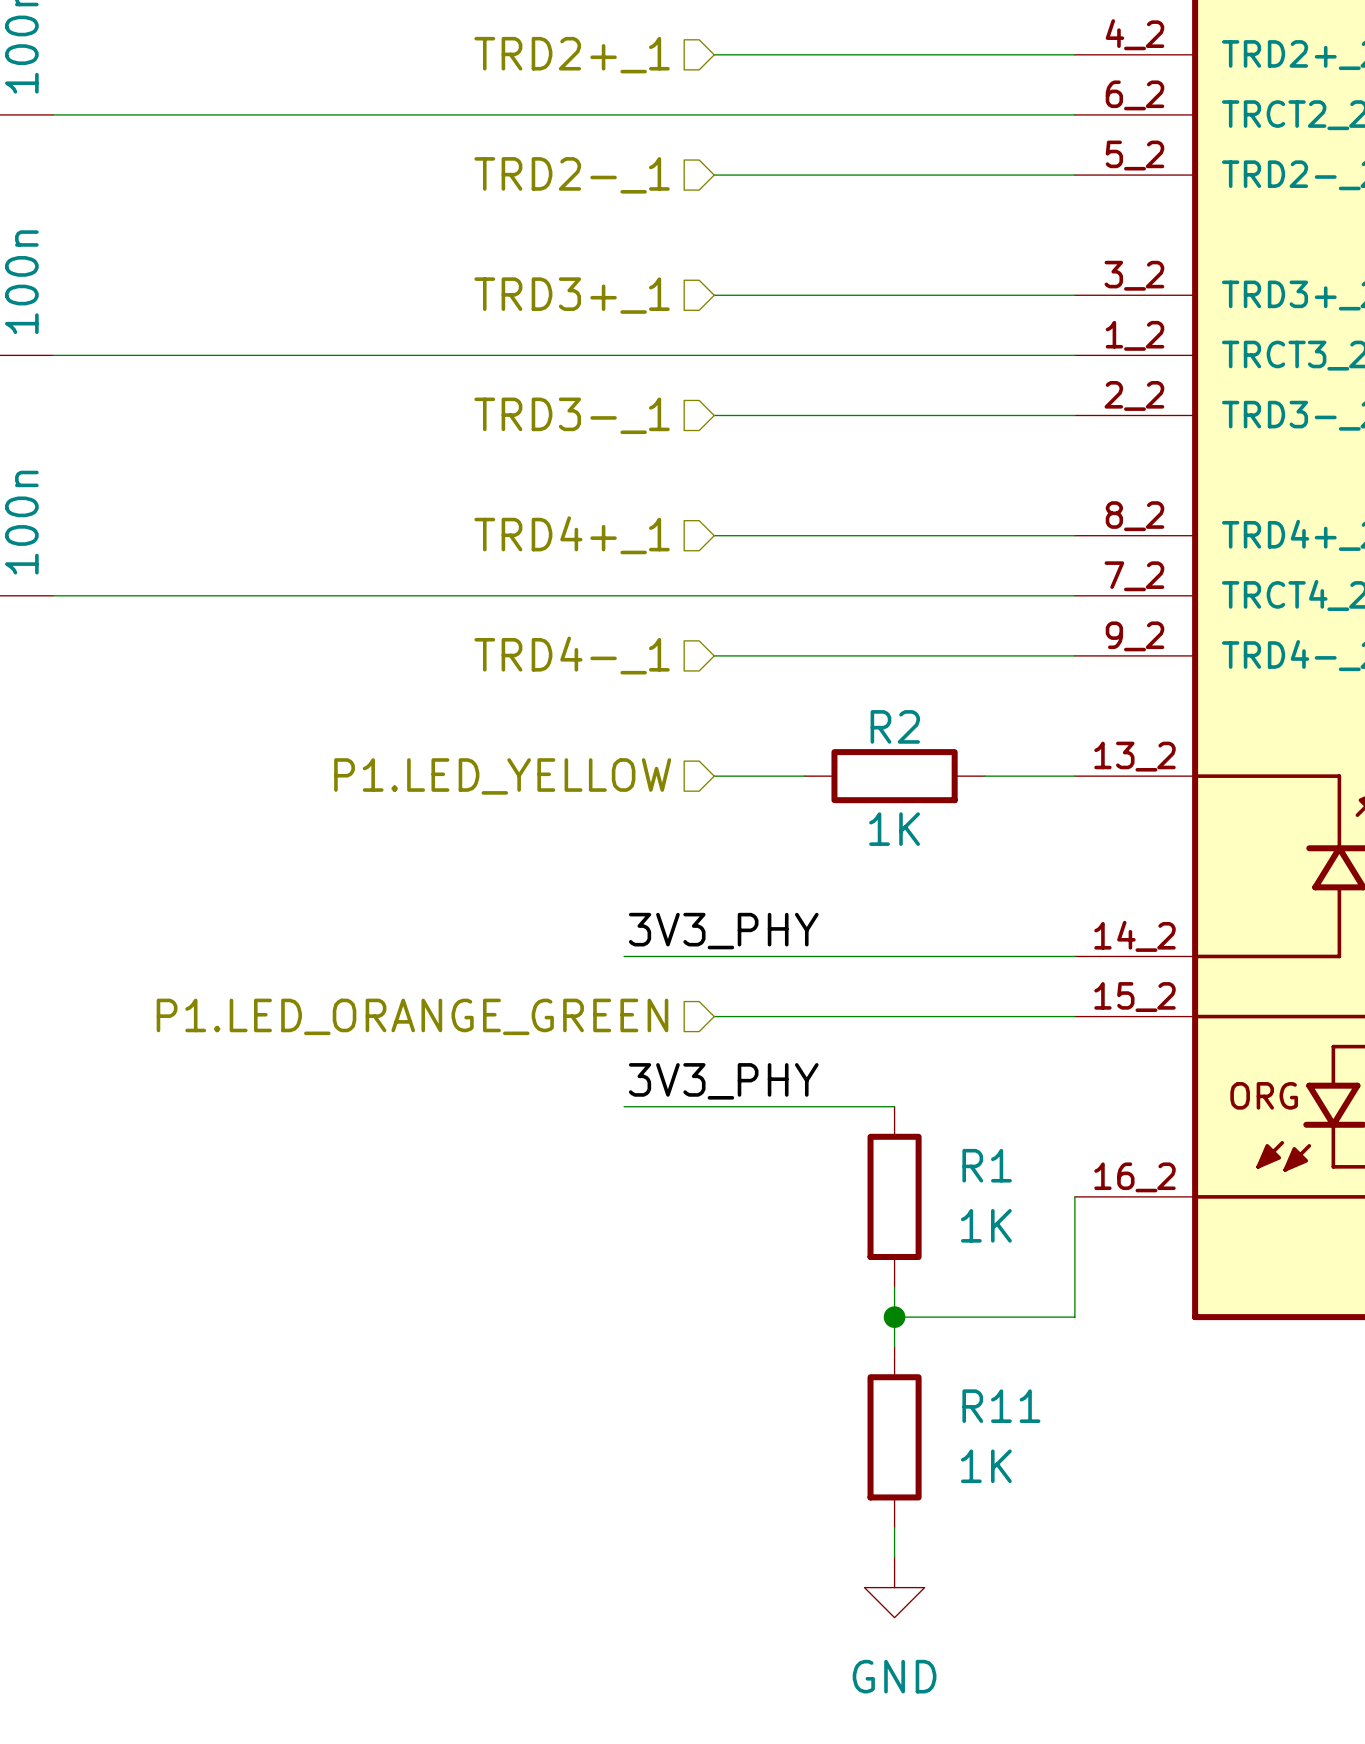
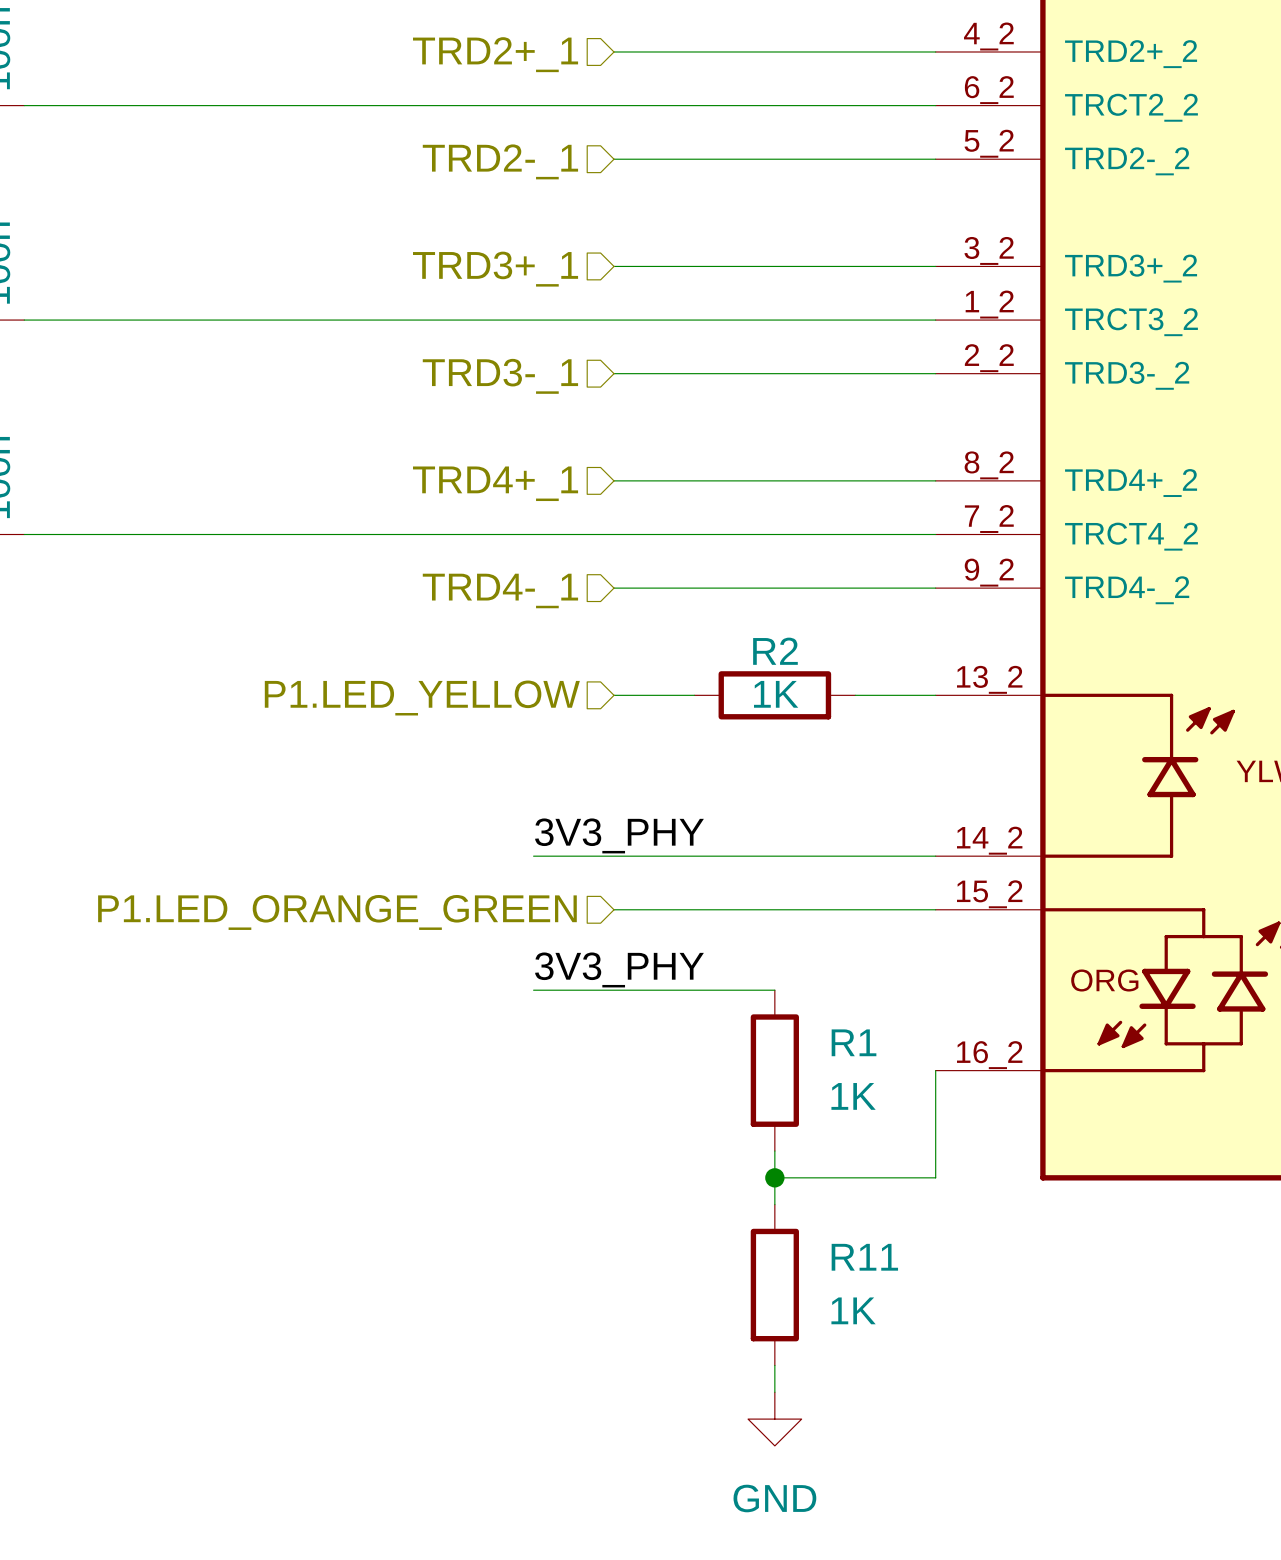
R2 value position: 1K (894, 829) -> 1K (776, 694)

